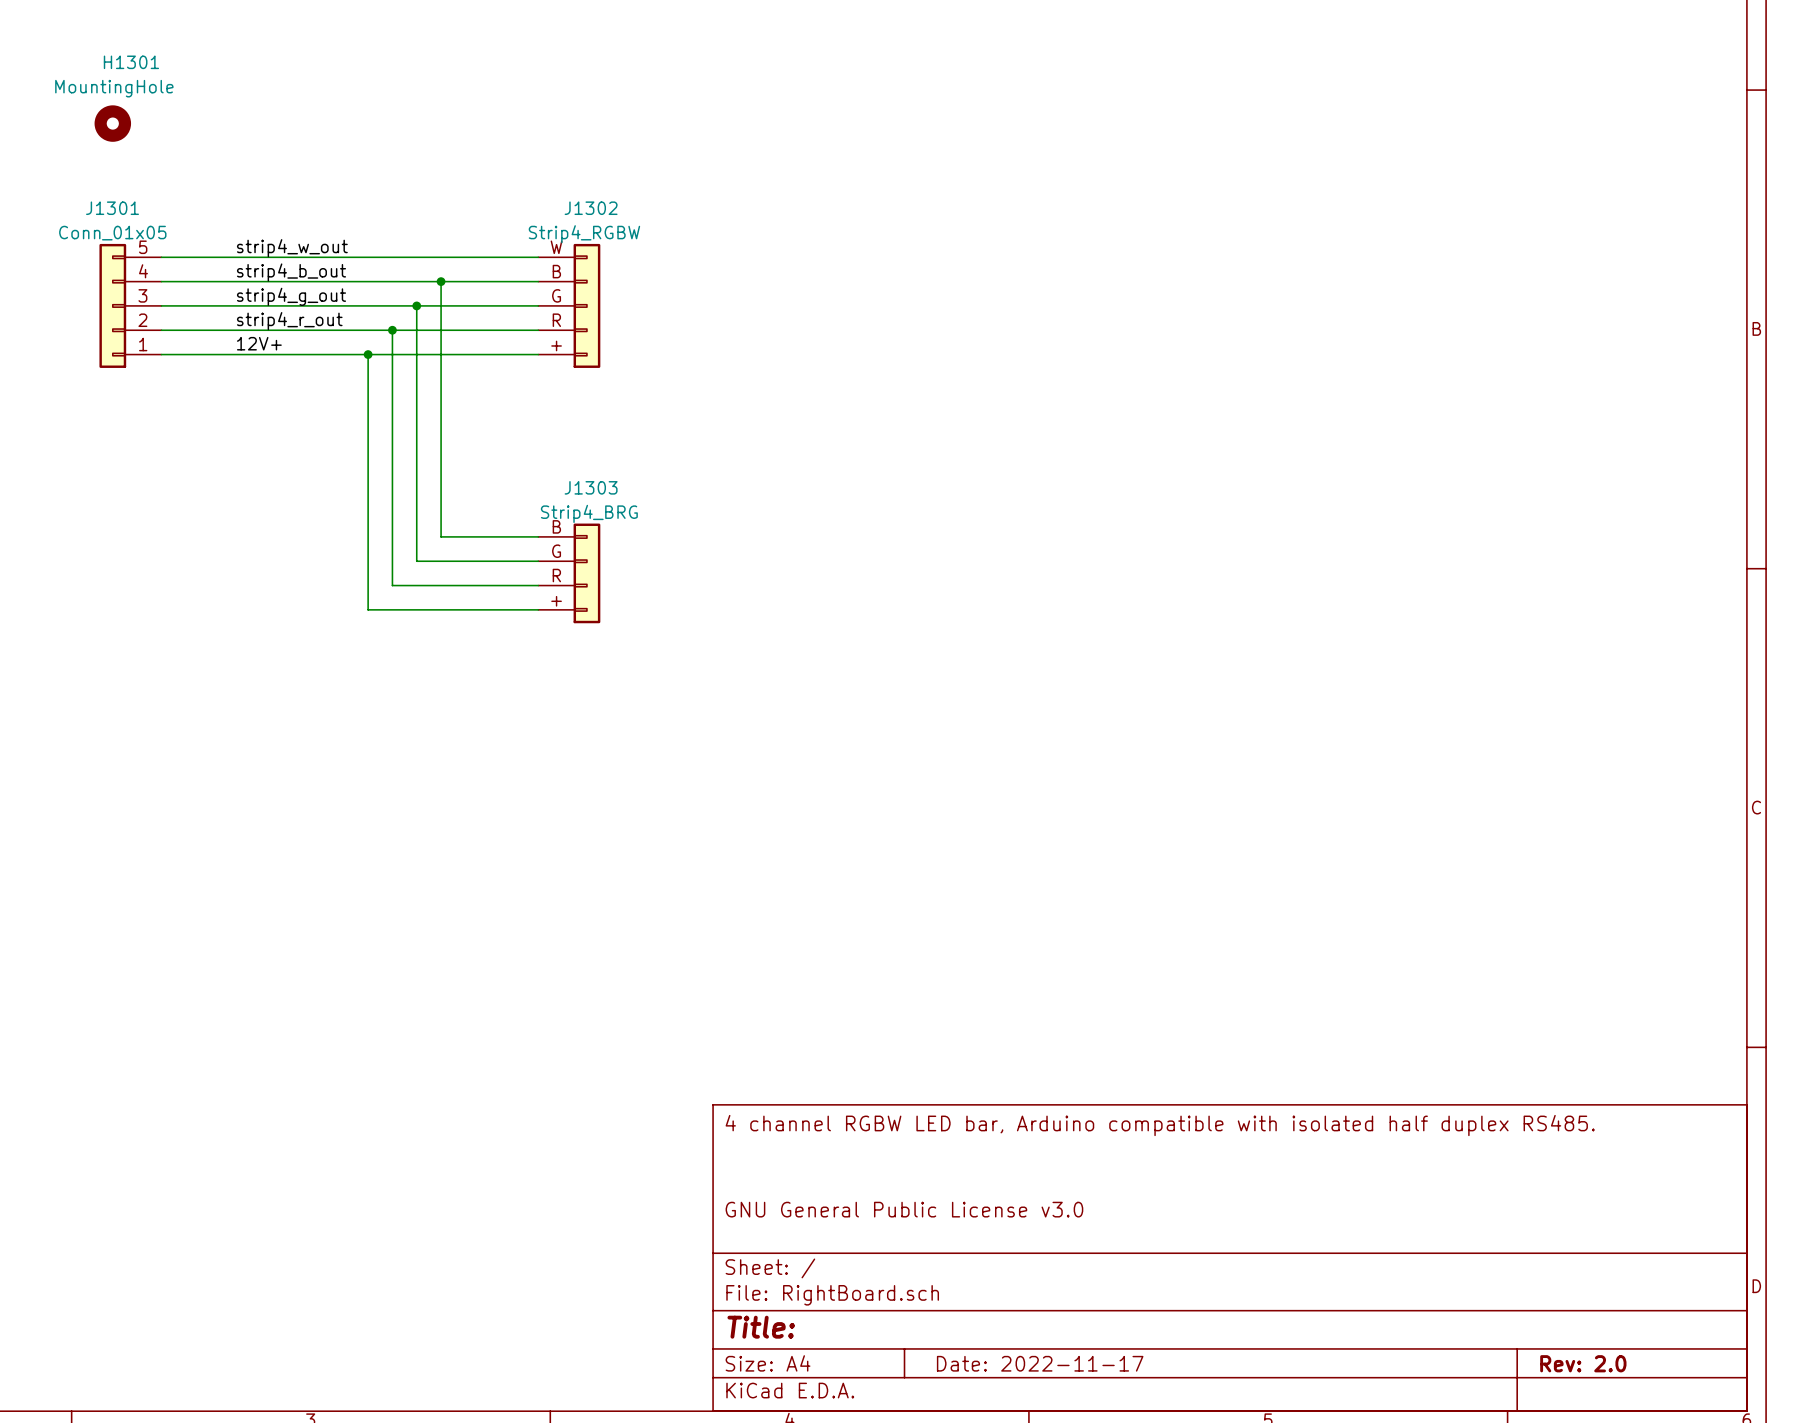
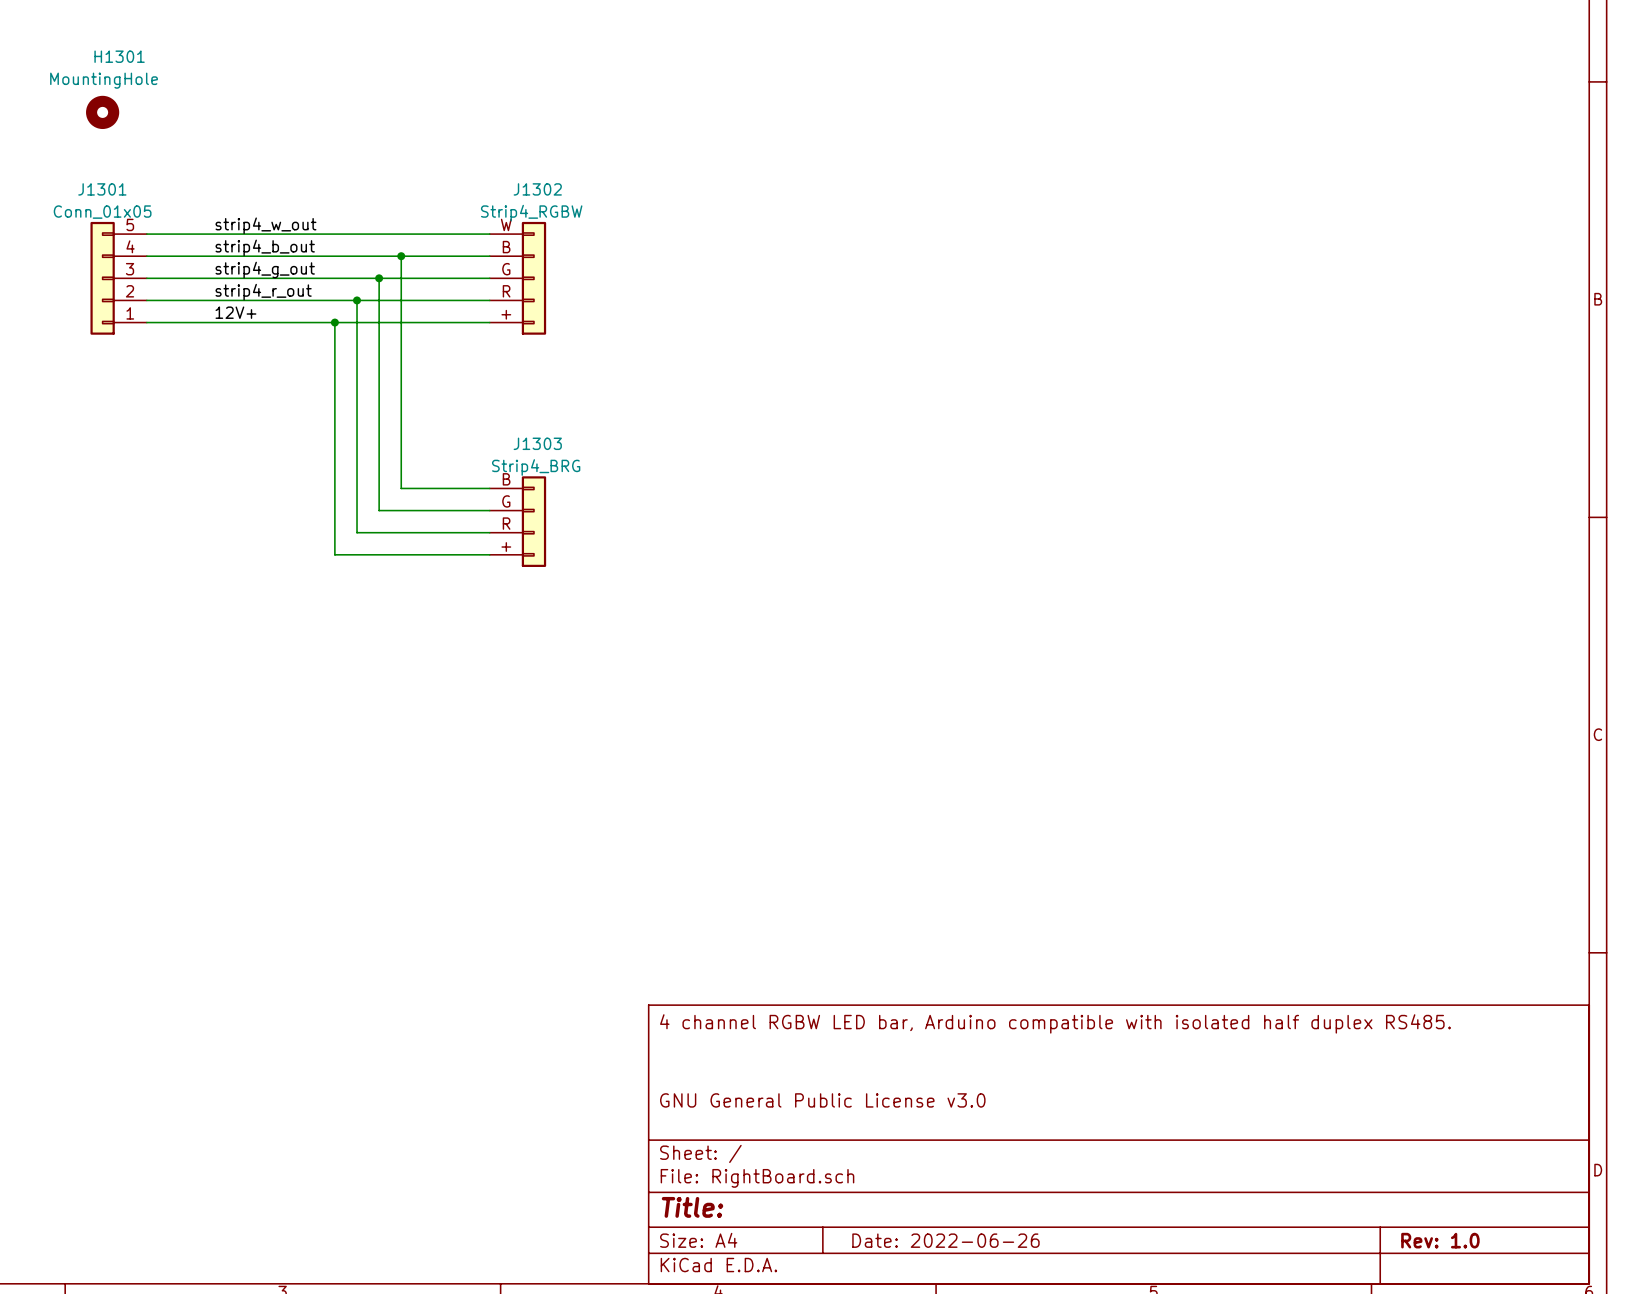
title block: Date: 2022-11-17 (1040, 1363) -> Date: 2022-06-26 (945, 1240)
title block: Rev: 2.0 (1583, 1363) -> Rev: 1.0 (1440, 1240)

